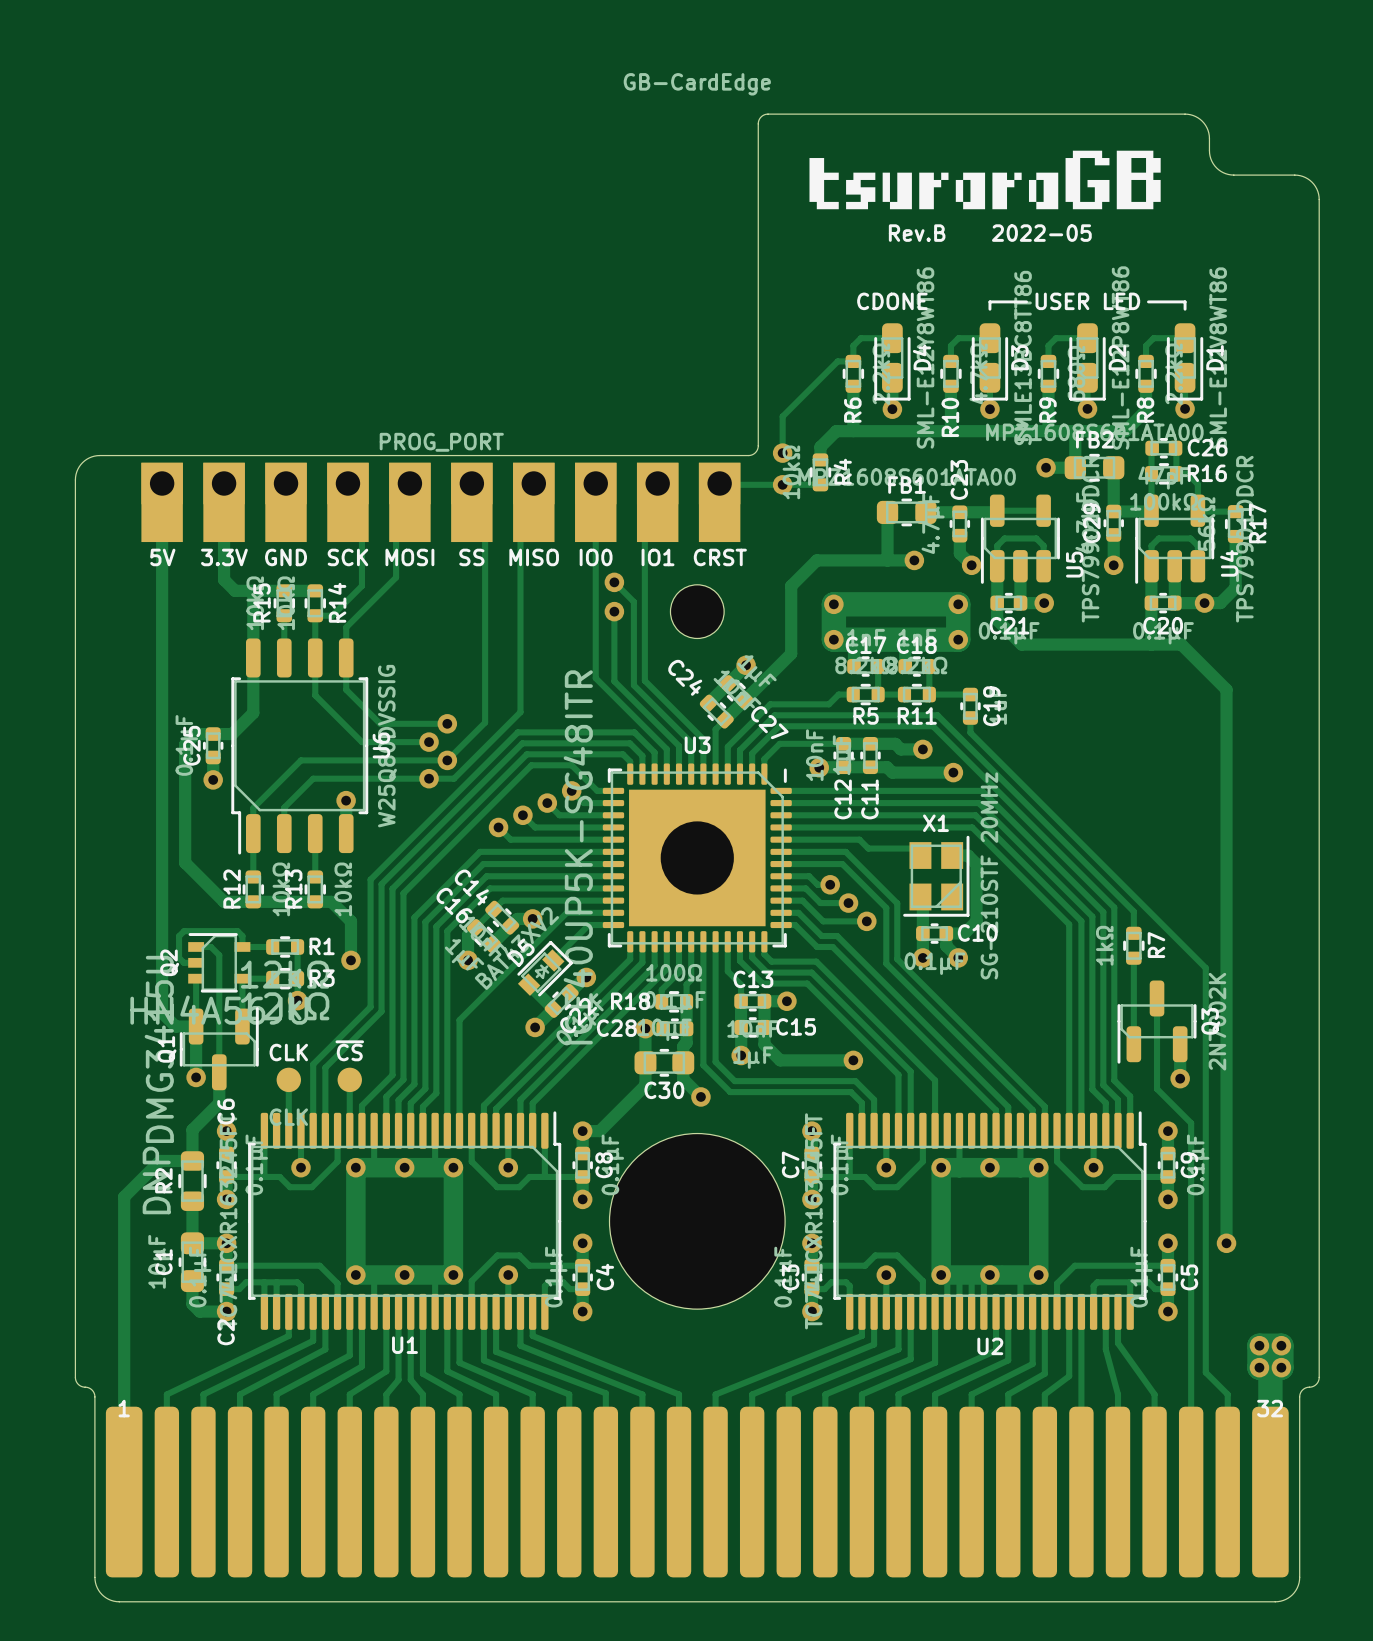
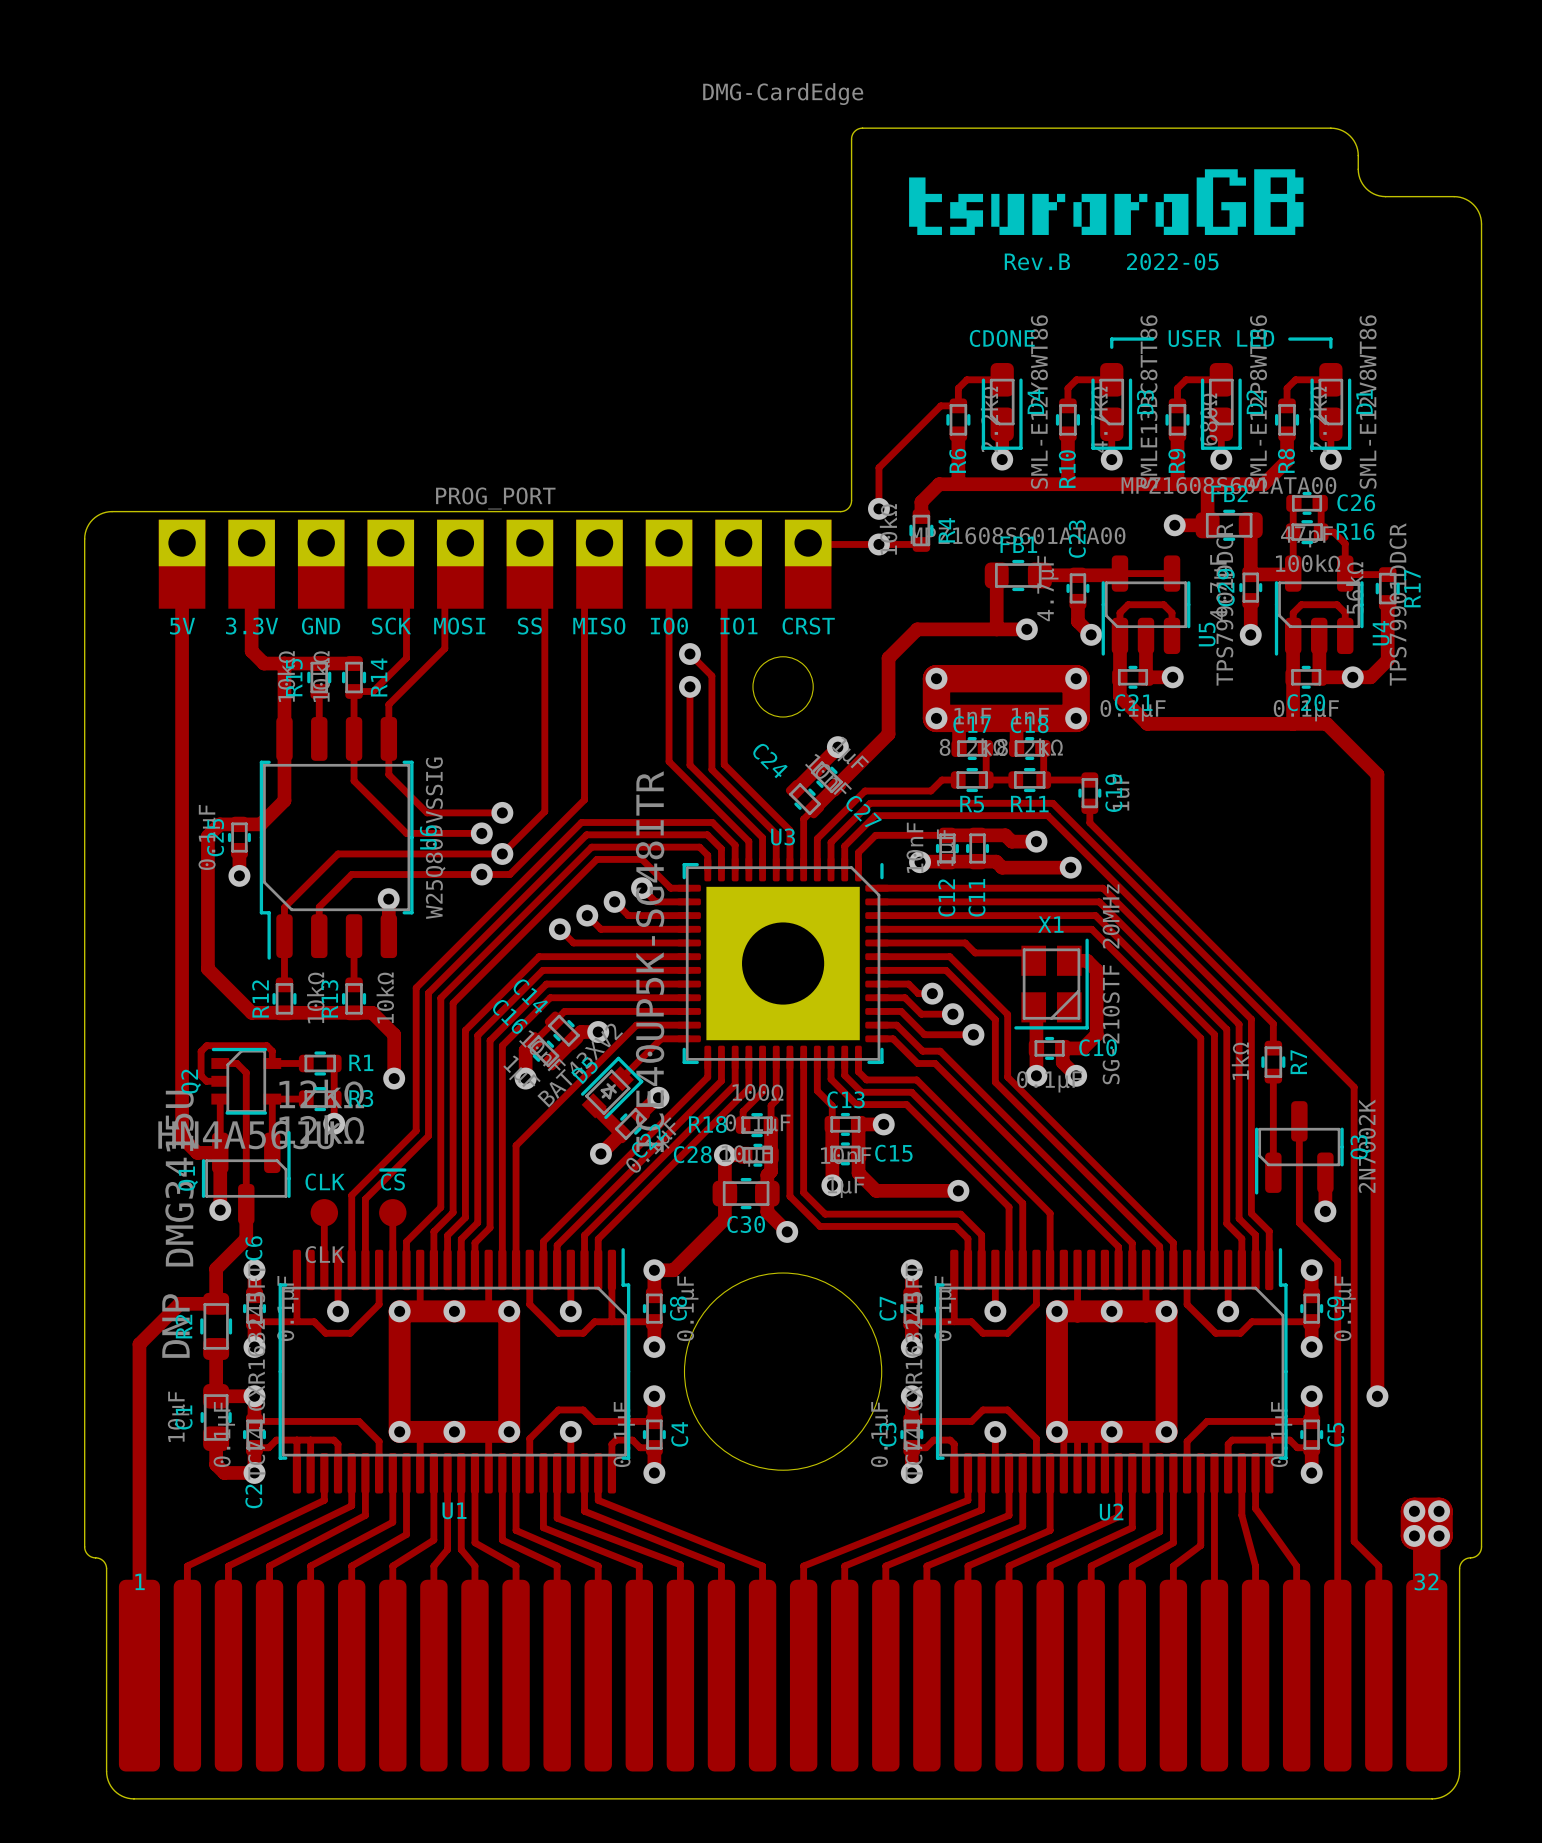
part value: GB-CardEdge (697, 84) -> DMG-CardEdge (783, 94)

